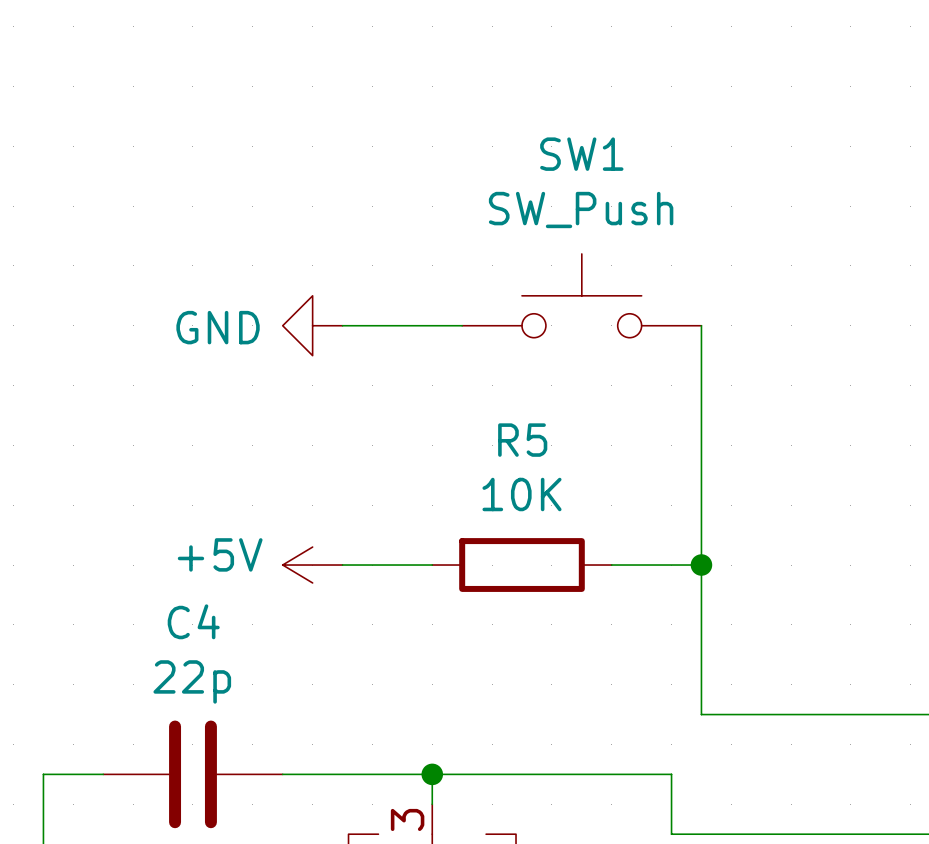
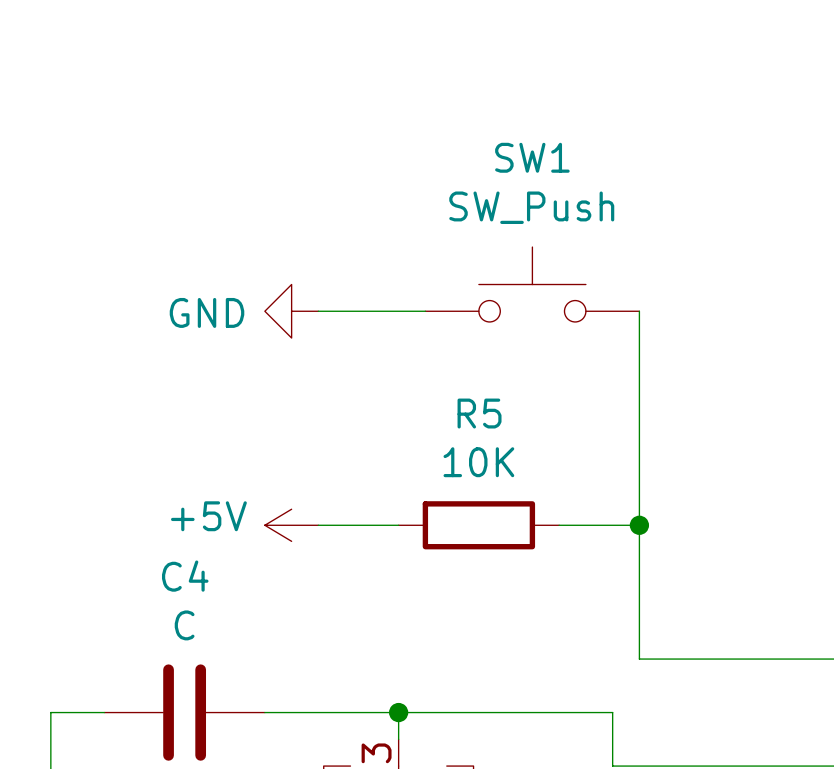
C4 value: 22p (192, 681) -> C (184, 625)

